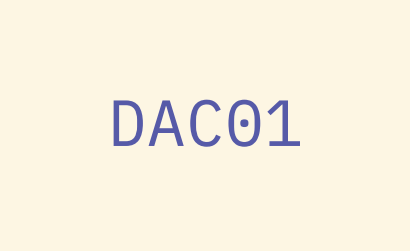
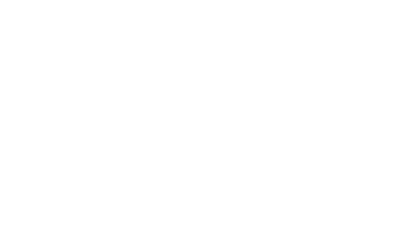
text: DAC01 (206, 123) -> none

